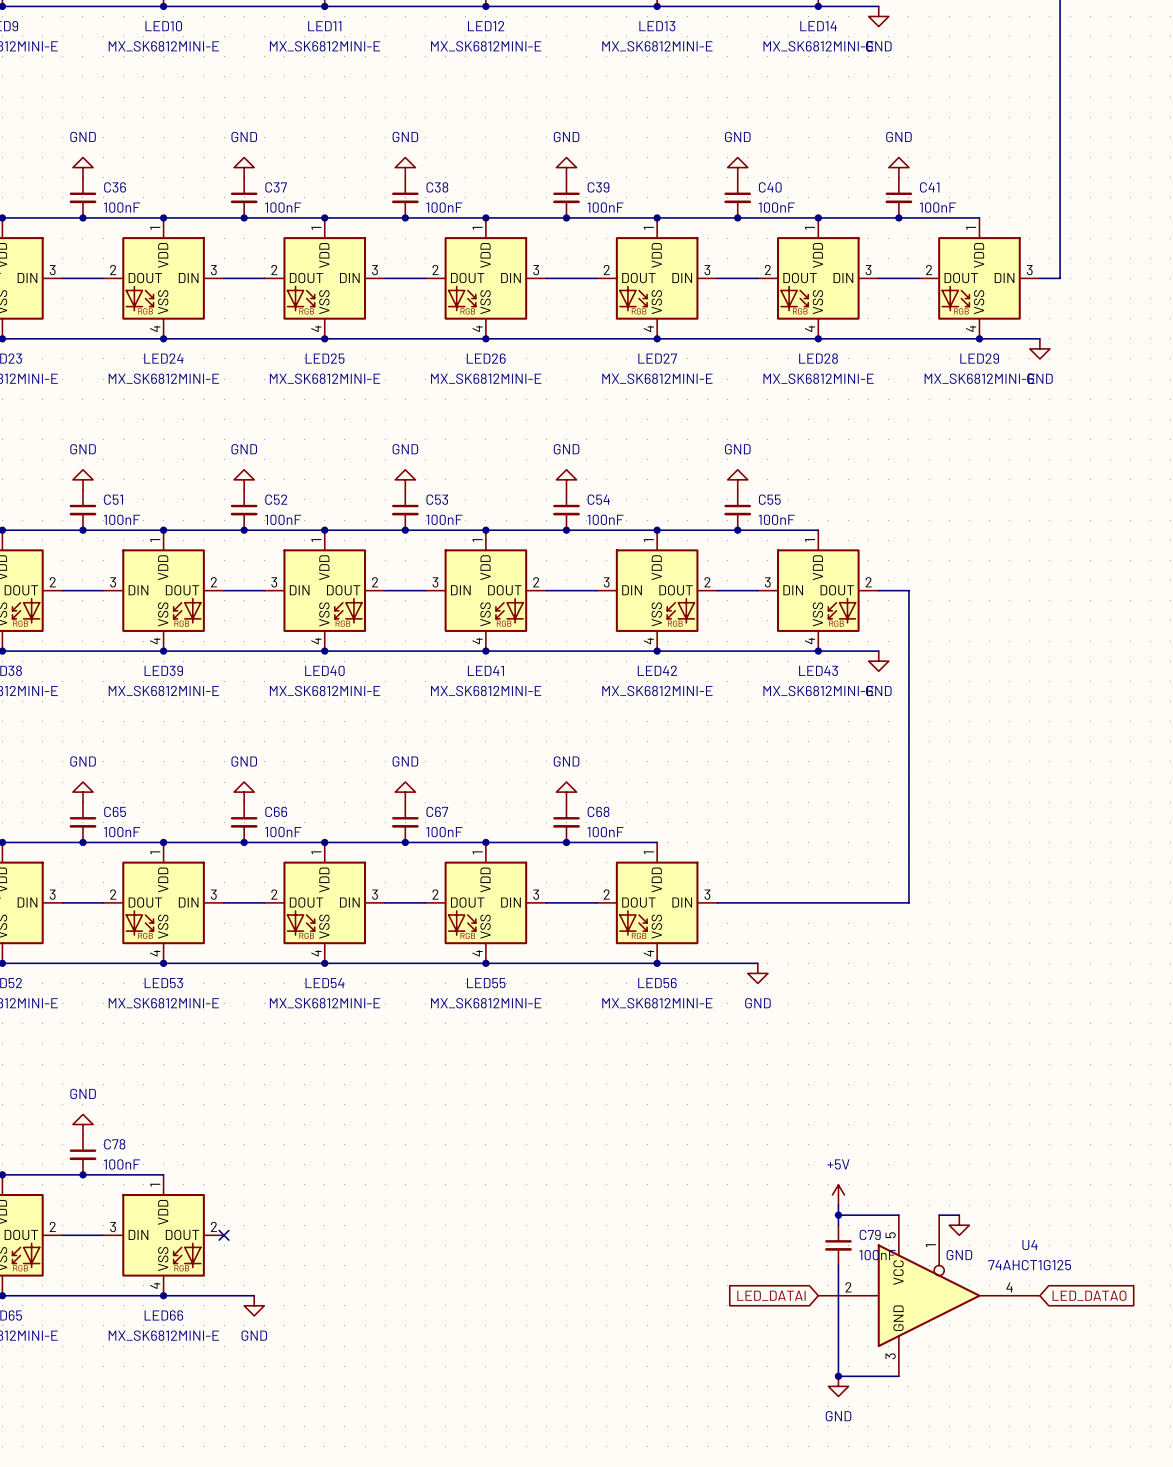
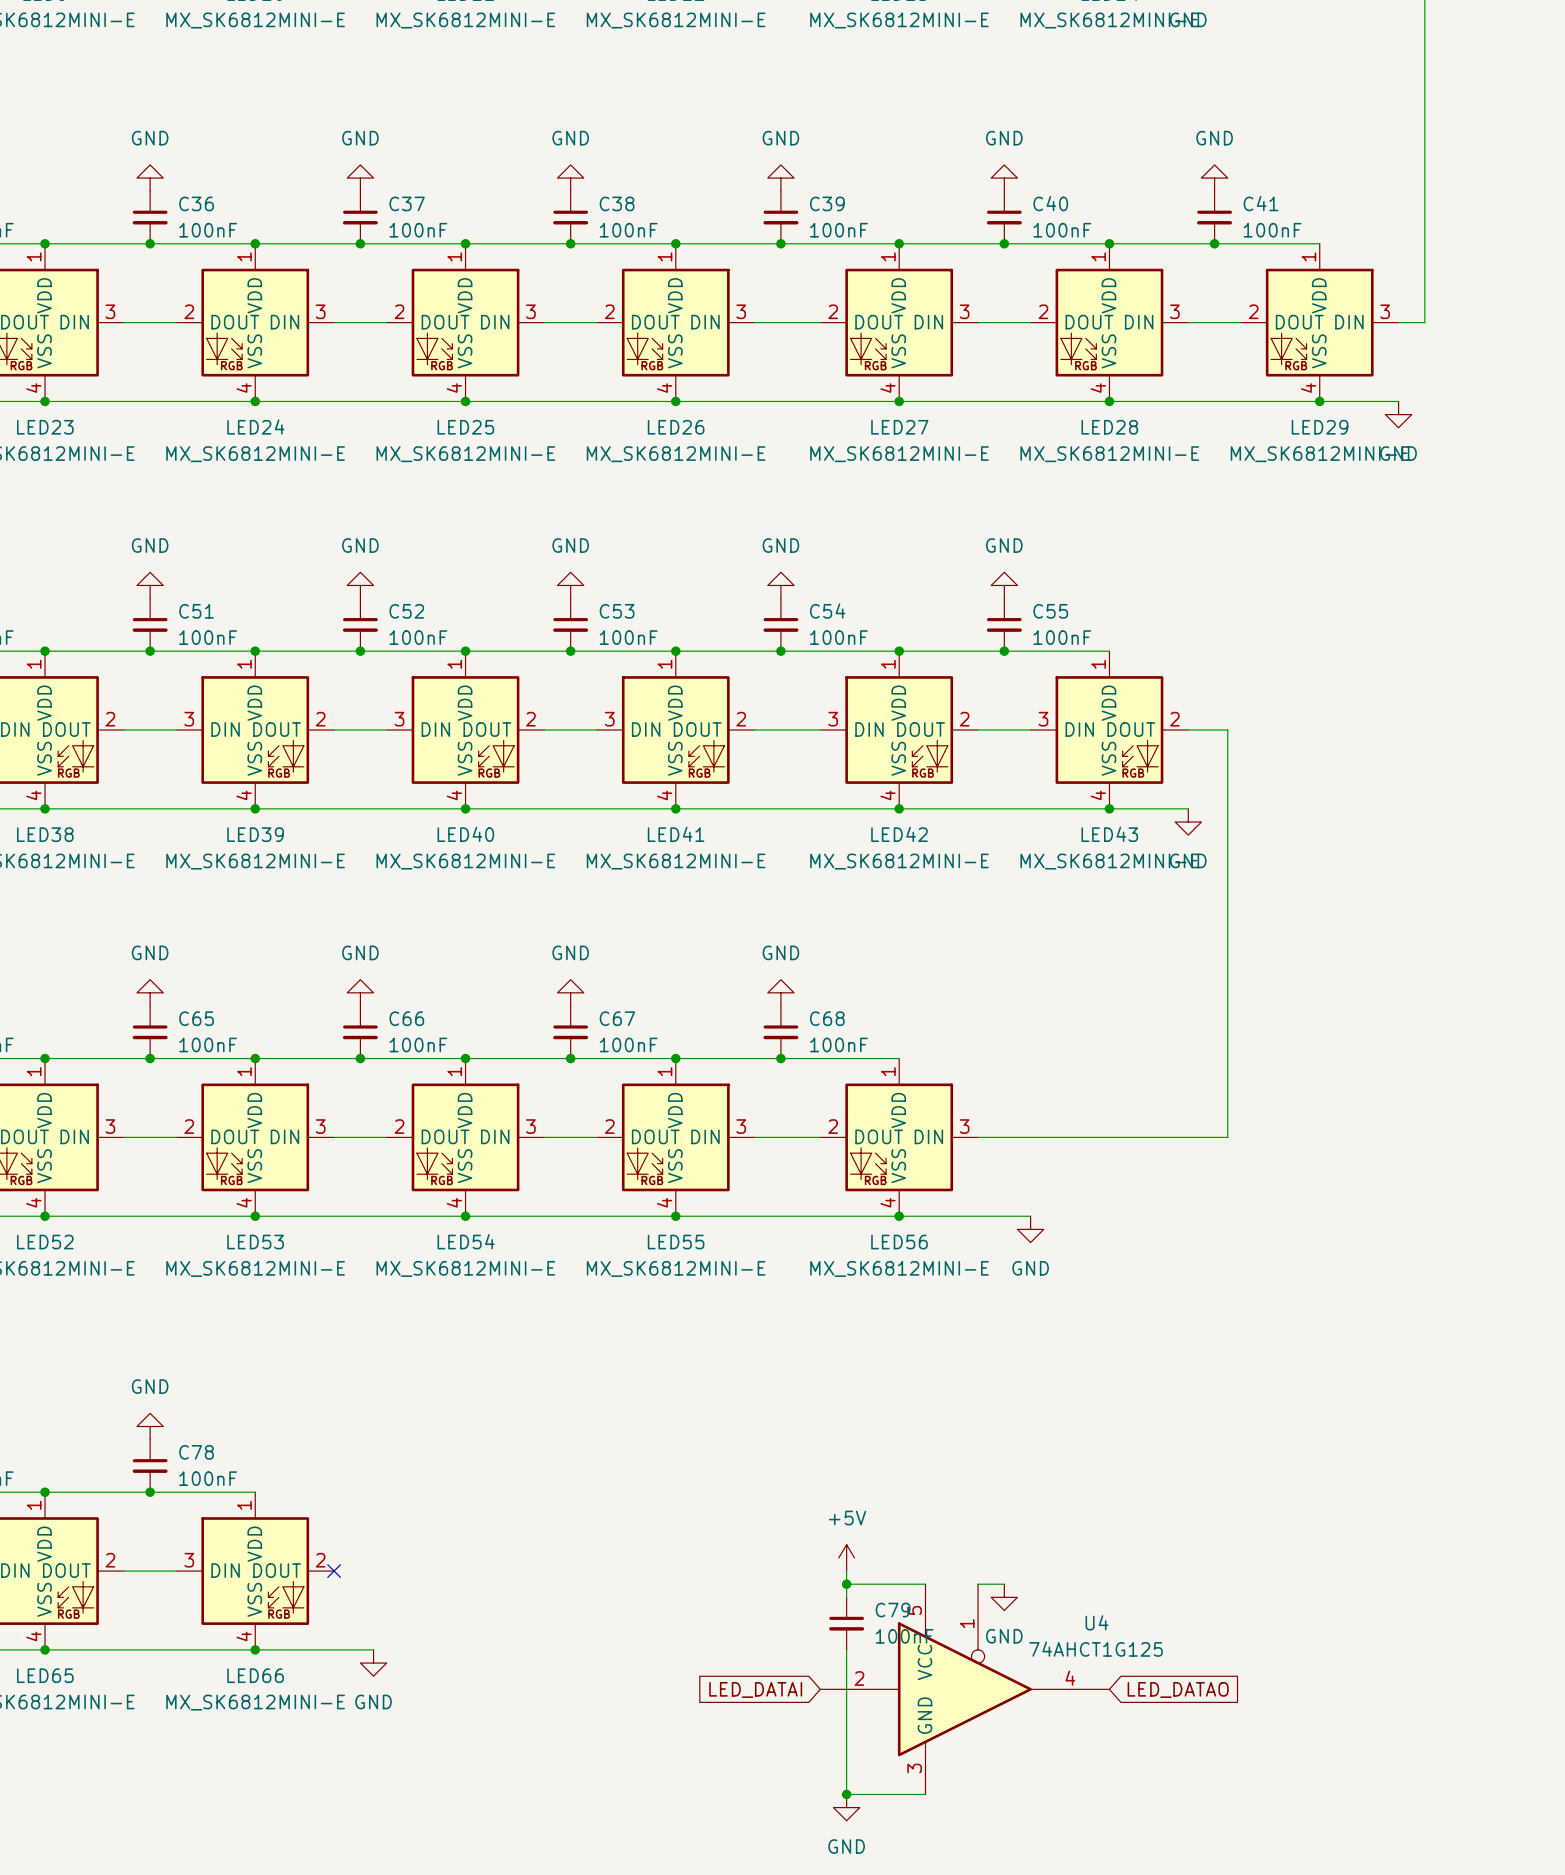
power symbol: +5V (838, 1195) -> none
wire: (838, 1205) (838, 1225) -> none
wire: (838, 1215) (898, 1215) -> none
junction: (838, 1215) -> none
wire: (939, 1215) (959, 1215) -> none
power symbol: none -> +5V (846, 1557)
power symbol: GND (959, 1225) -> none
wire: none -> (846, 1571) (846, 1597)
wire: none -> (846, 1584) (925, 1584)
junction: none -> (846, 1584)
wire: none -> (978, 1584) (1004, 1584)
C79 position: (838, 1245) -> (846, 1623)
power symbol: none -> GND (1004, 1597)
wire: (838, 1265) (838, 1376) (898, 1376) -> none
wire: none -> (846, 1649) (846, 1794) (925, 1794)
global label: LED_DATAI (771, 1295) -> none
U4 position: (929, 1295) -> (964, 1689)
global label: LED_DATAO (1089, 1295) -> none
global label: none -> LED_DATAI (755, 1689)
global label: none -> LED_DATAO (1178, 1689)
junction: (838, 1376) -> none
power symbol: GND (838, 1386) -> none
junction: none -> (846, 1794)
power symbol: none -> GND (846, 1807)

